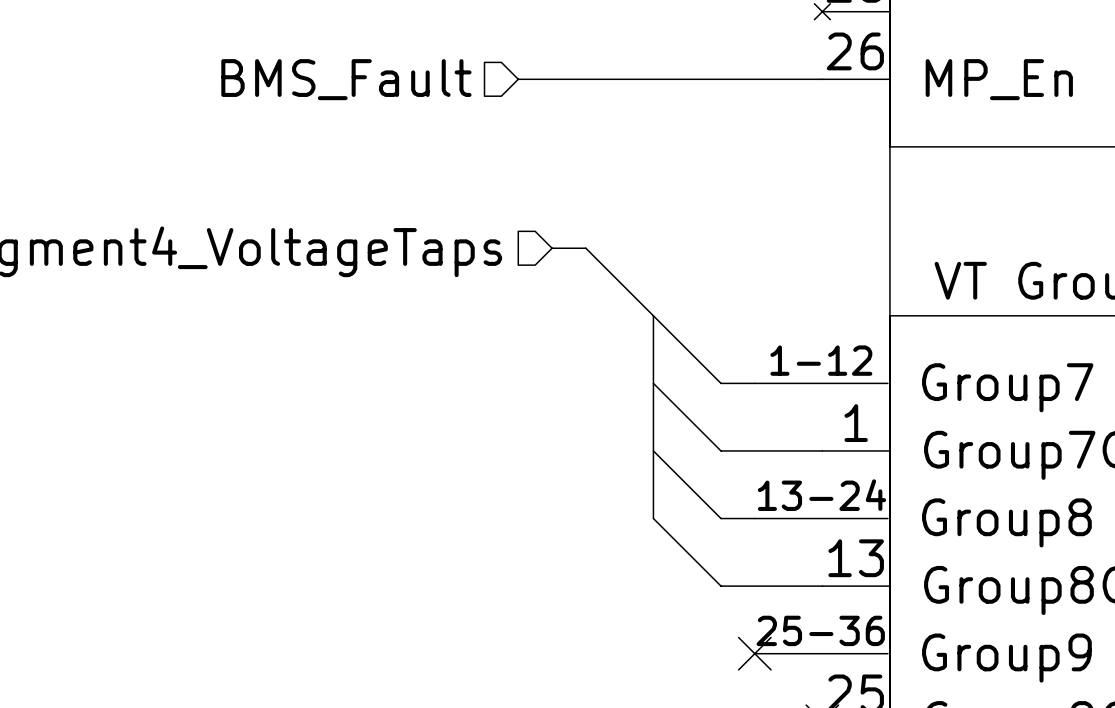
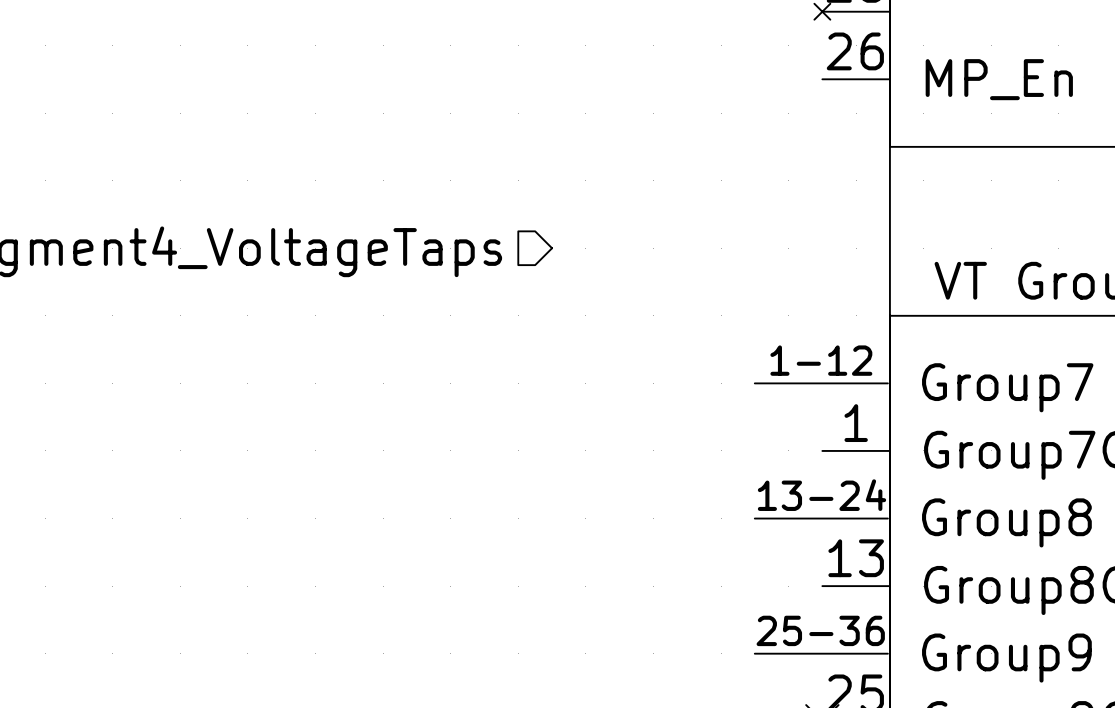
hierarchical label: BMS_Fault (346, 79) -> none
wire: (518, 79) (822, 79) -> none
bus: (552, 248) (585, 248) (653, 315) (653, 518) -> none
wire: (653, 315) (721, 383) (754, 383) -> none
wire: (653, 383) (721, 450) (822, 450) -> none
wire: (653, 450) (721, 518) (754, 518) -> none
wire: (653, 518) (721, 586) (822, 586) -> none
no-connect mark: (754, 653) -> none

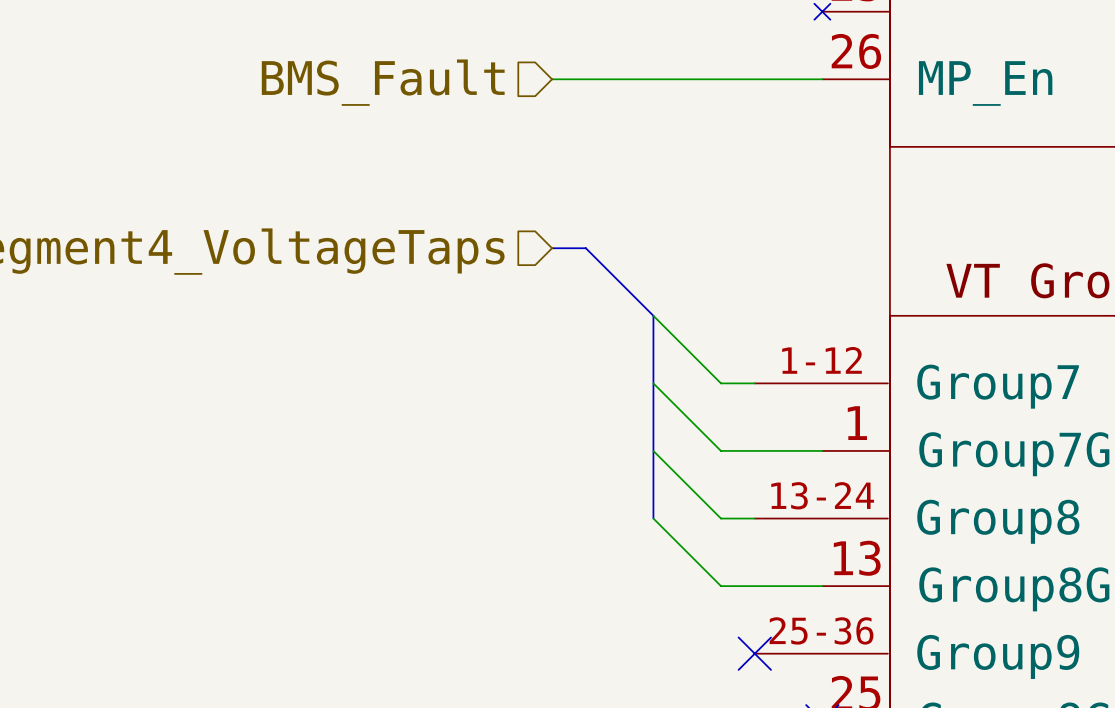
hierarchical label: none -> BMS_Fault (383, 82)
wire: none -> (552, 79) (822, 79)
bus: none -> (552, 248) (585, 248) (653, 315) (653, 518)
wire: none -> (653, 315) (721, 383) (754, 383)
wire: none -> (653, 383) (721, 450) (822, 450)
wire: none -> (653, 450) (721, 518) (754, 518)
wire: none -> (653, 518) (721, 586) (822, 586)
no-connect mark: none -> (754, 653)

